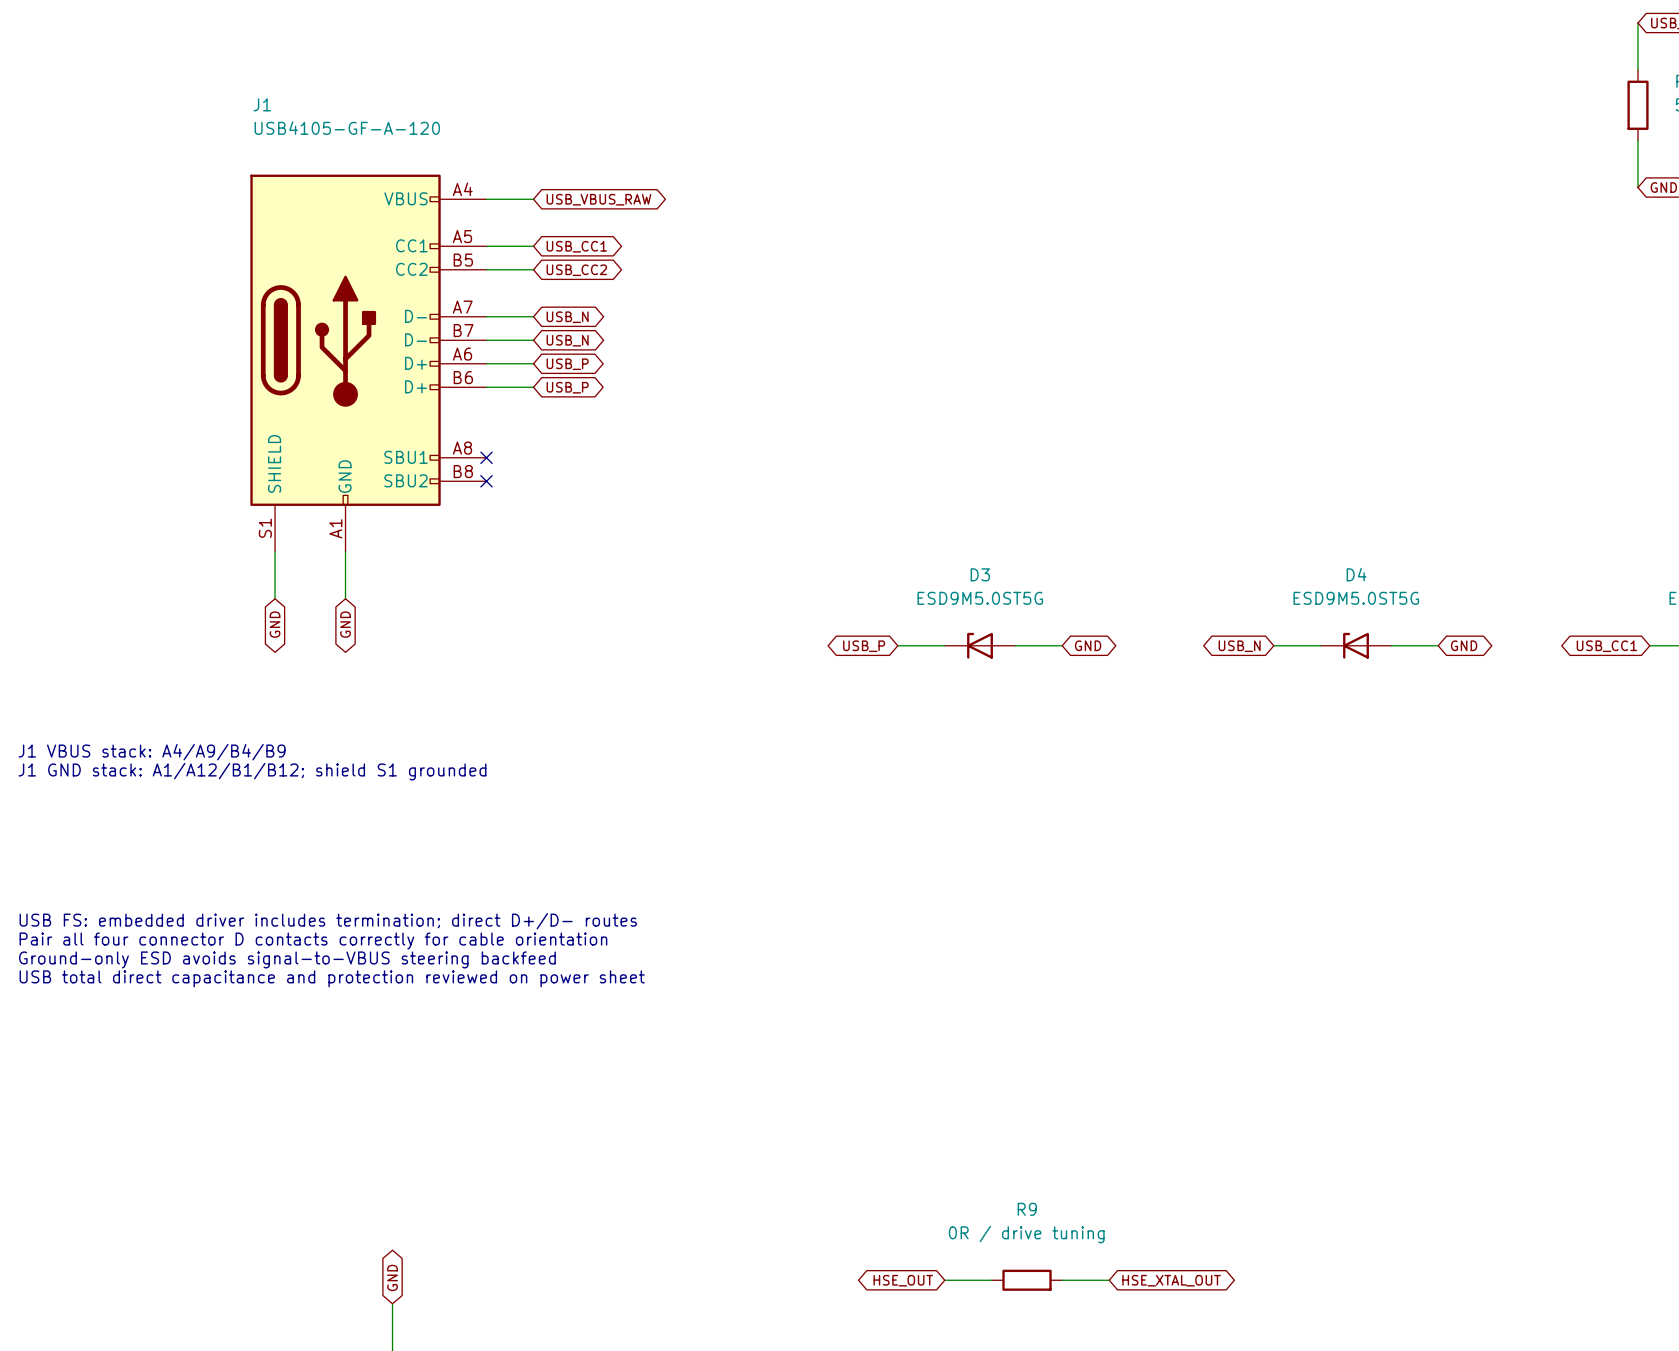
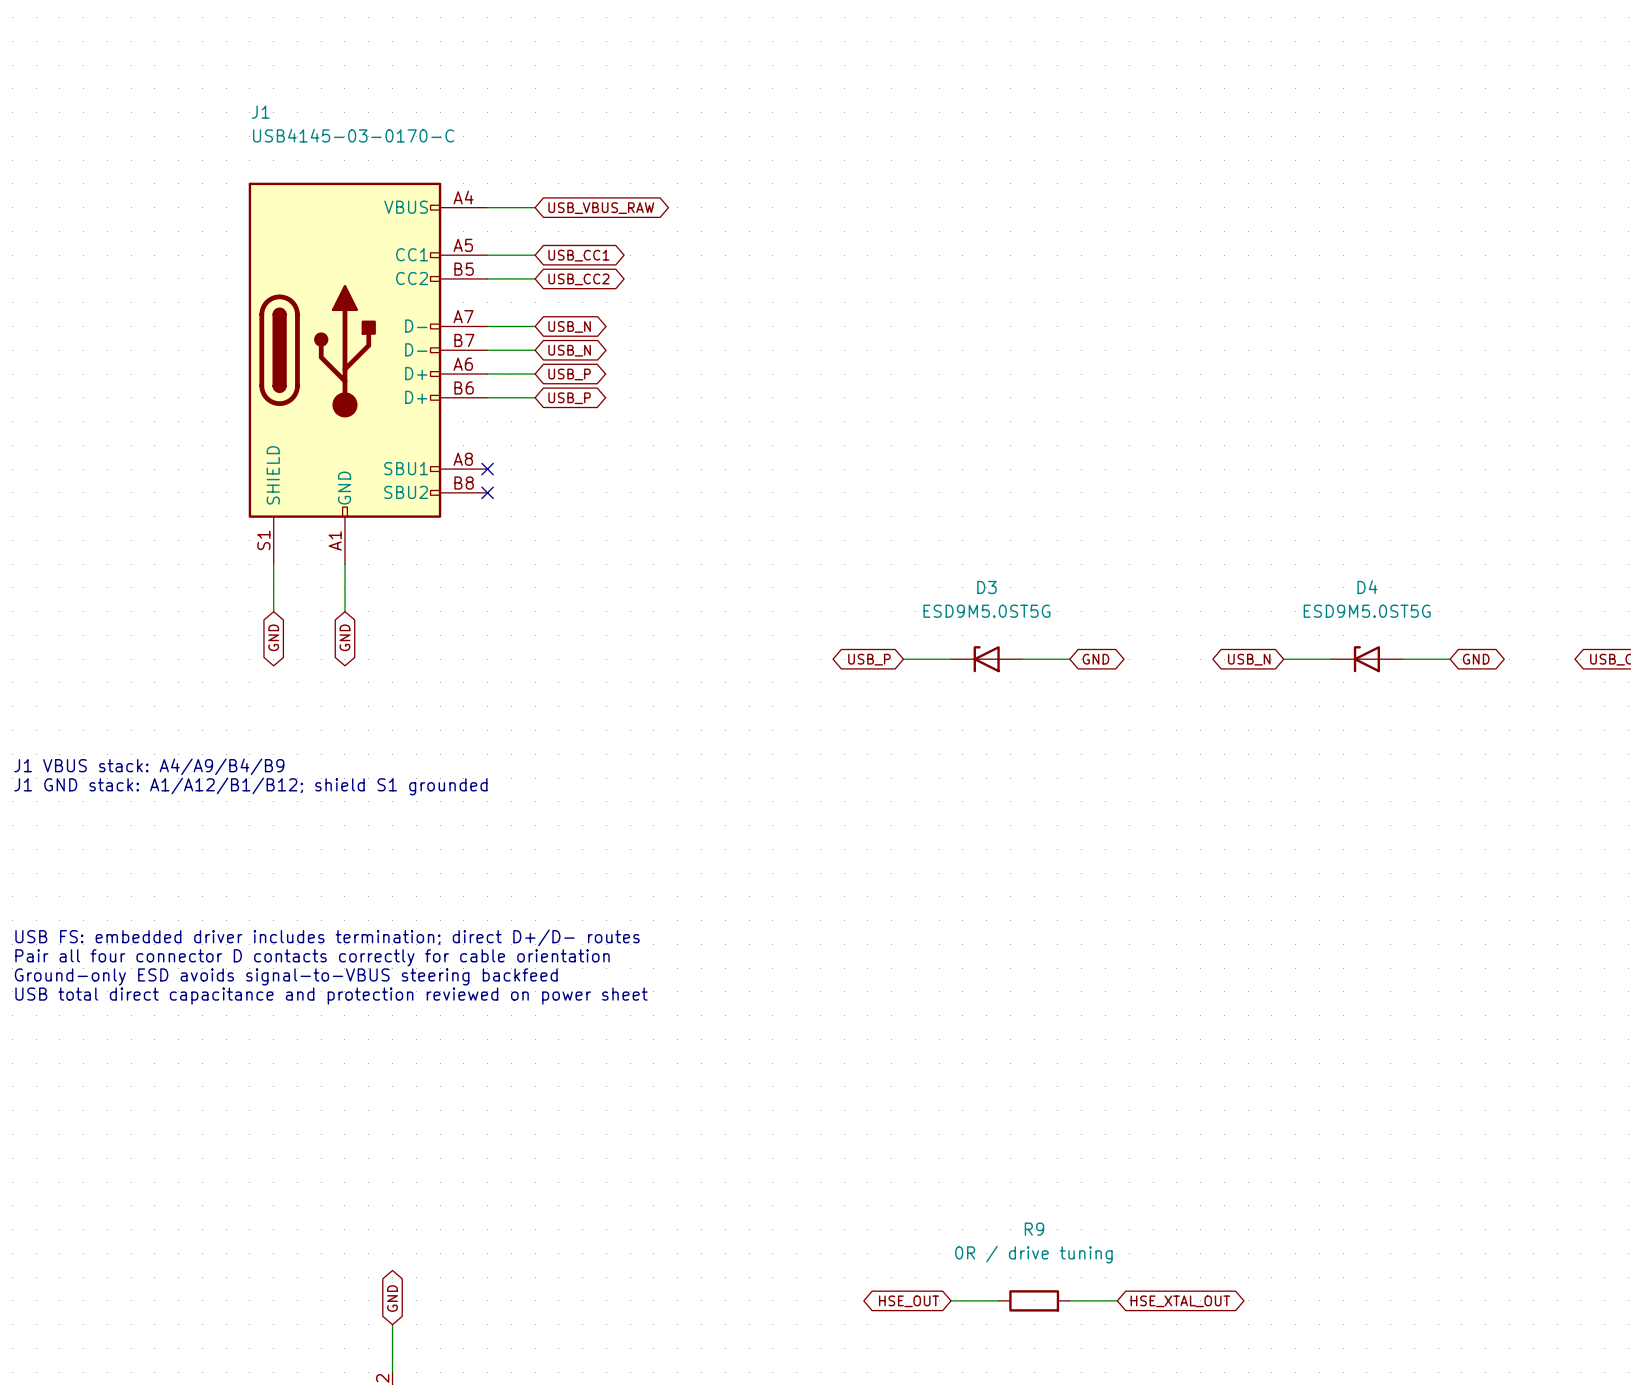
J1 value: USB4105-GF-A-120 (347, 128) -> USB4145-03-0170-C (353, 135)

